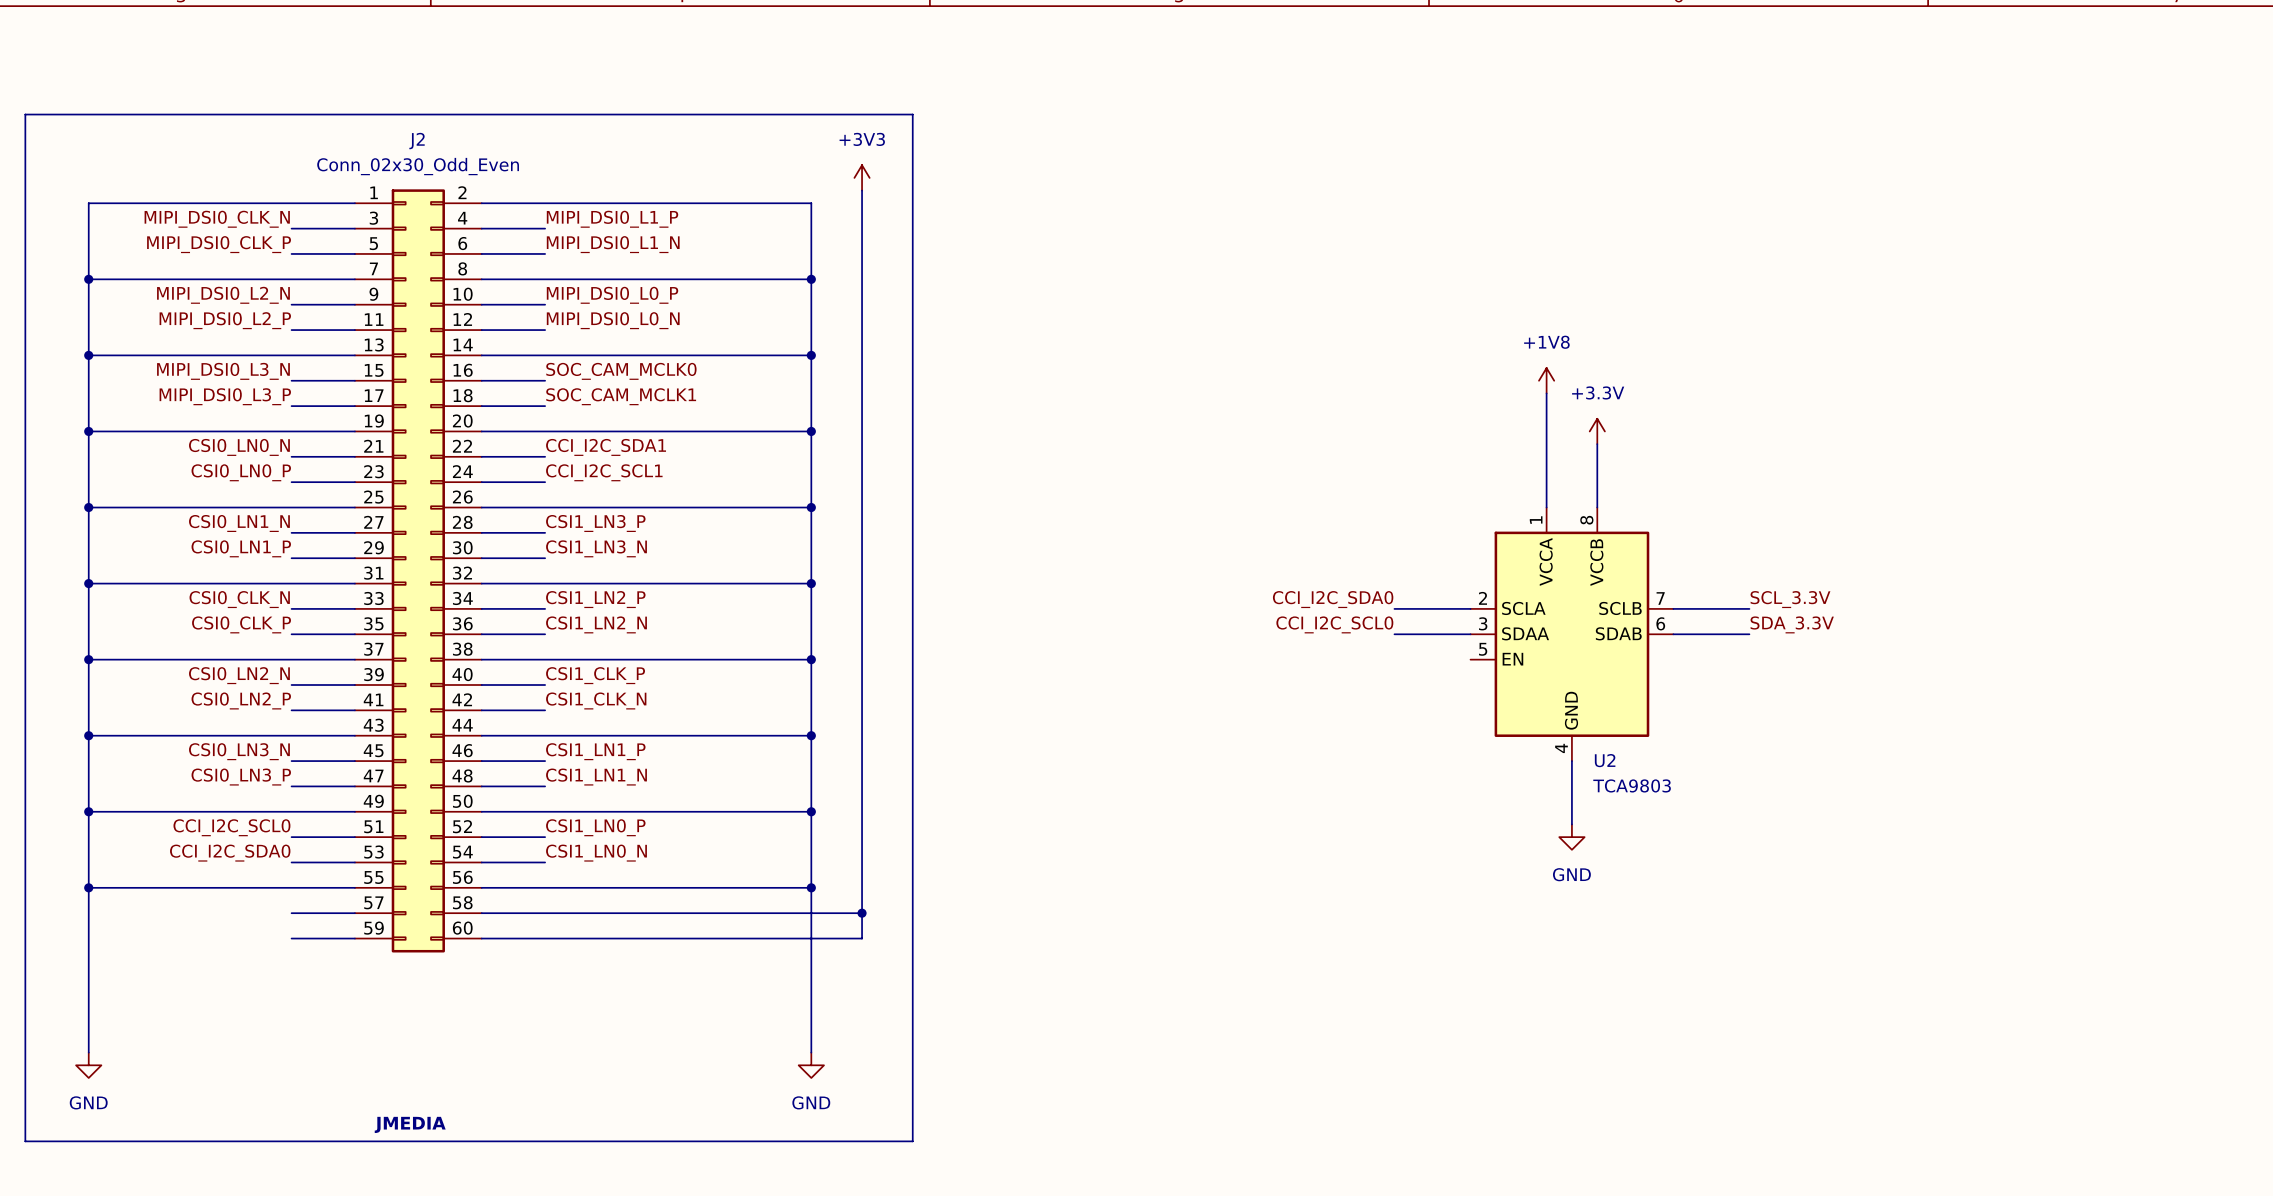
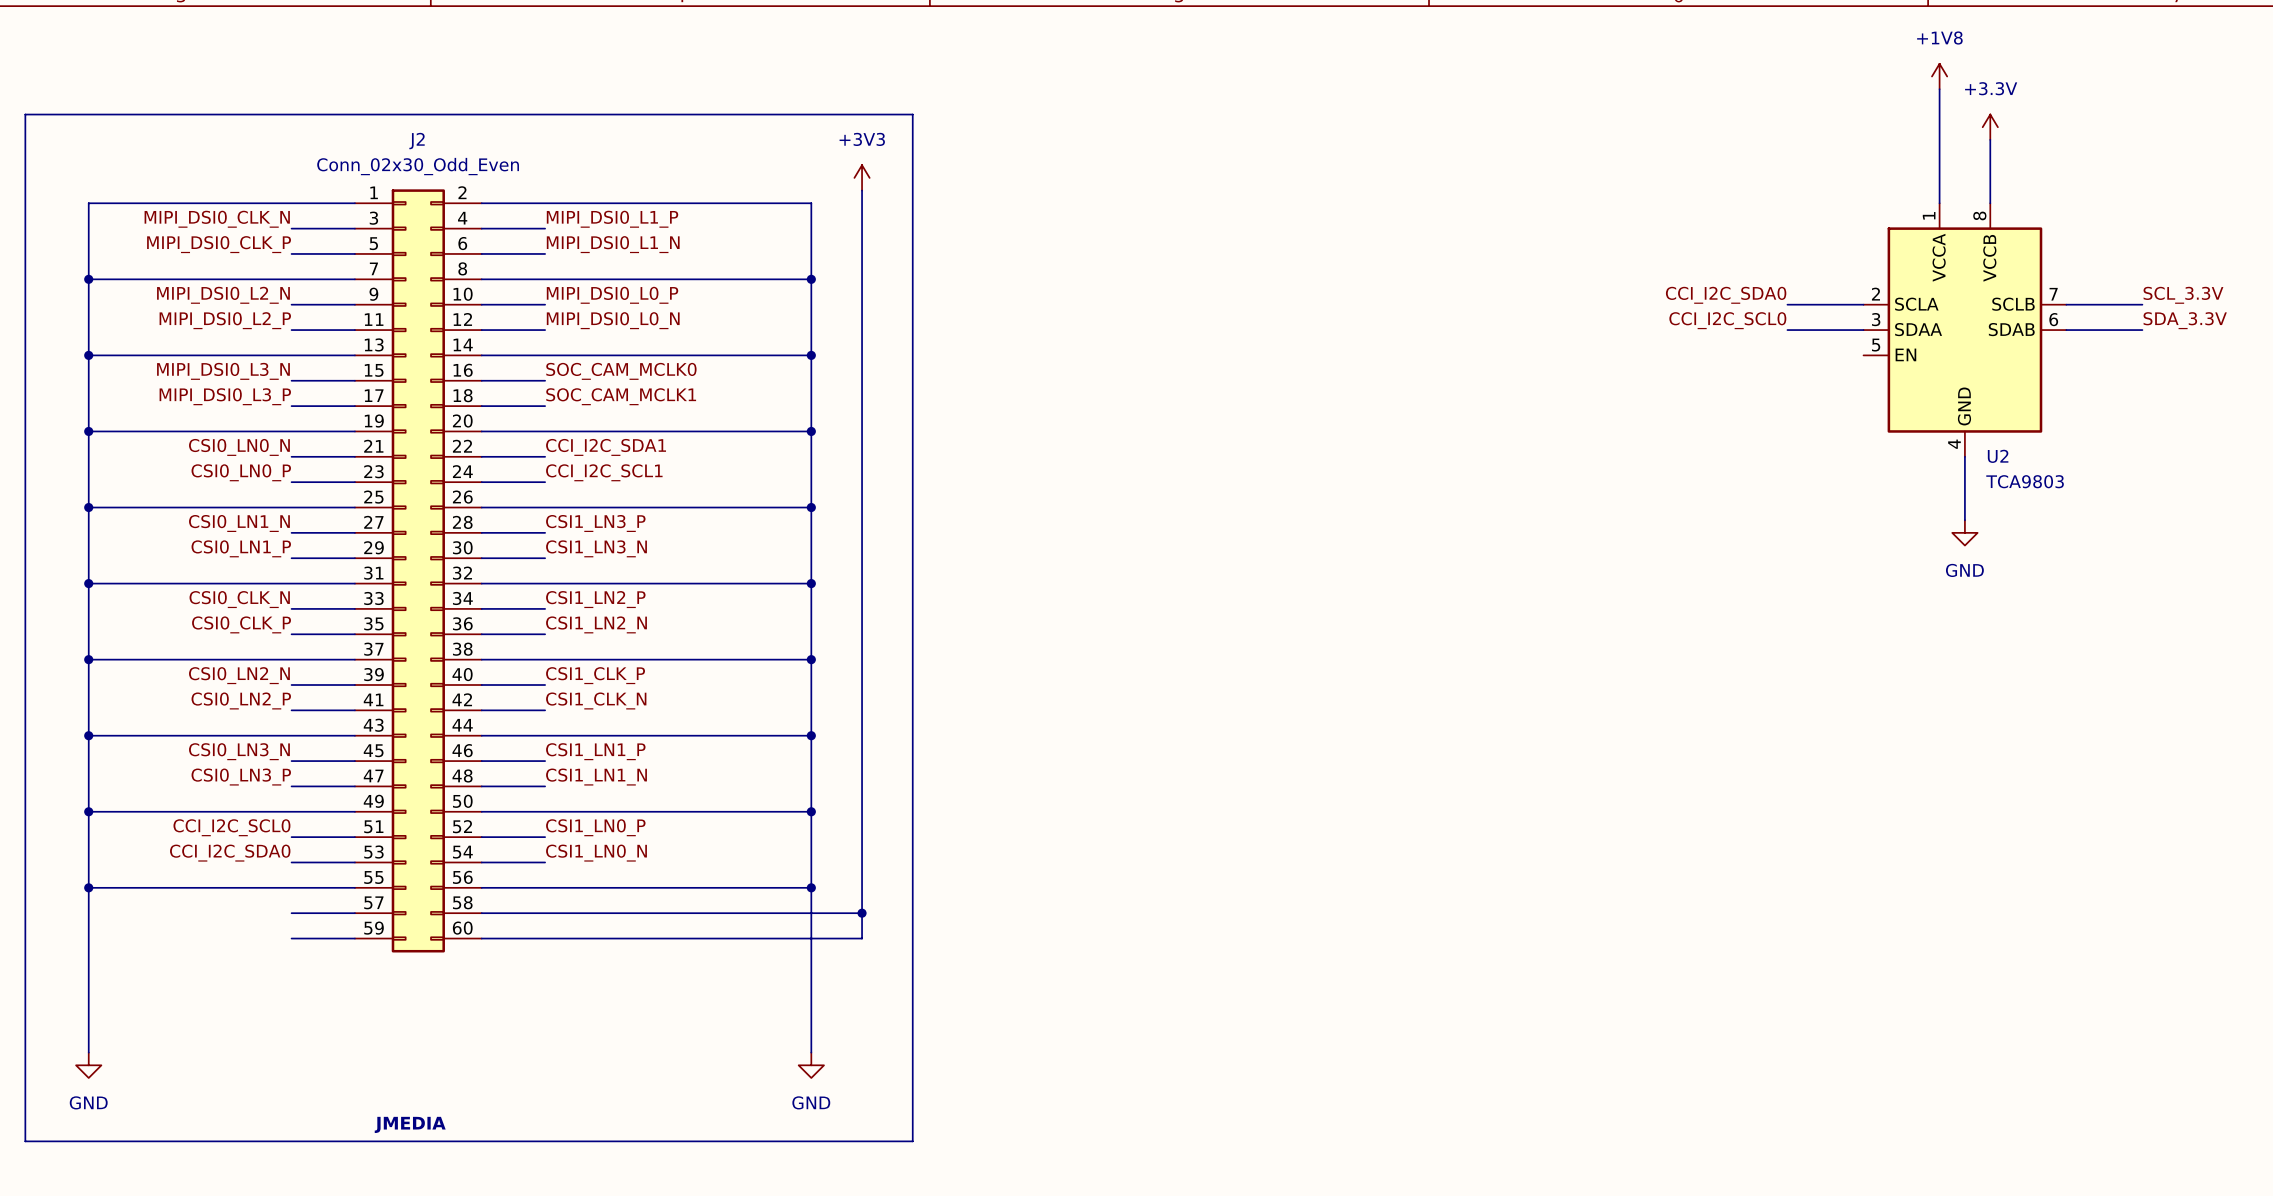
power symbol: none -> +1V8 (1939, 76)
wire: none -> (1939, 89) (1939, 203)
power symbol: none -> +3.3V (1990, 127)
wire: none -> (1990, 139) (1990, 203)
label: none -> CCI_I2C_SDA0 (1726, 295)
label: none -> SCL_3.3V (2183, 295)
wire: none -> (1787, 304) (1863, 304)
wire: none -> (2066, 304) (2142, 304)
label: none -> CCI_I2C_SCL0 (1727, 320)
label: none -> SDA_3.3V (2185, 320)
wire: none -> (1787, 330) (1863, 330)
wire: none -> (2066, 330) (2142, 330)
power symbol: +1V8 (1546, 380) -> none
wire: (1546, 393) (1546, 507) -> none
power symbol: +3.3V (1597, 431) -> none
wire: (1597, 444) (1597, 507) -> none
wire: none -> (1964, 456) (1964, 520)
power symbol: none -> GND (1964, 532)
label: CCI_I2C_SDA0 (1333, 599) -> none
label: SCL_3.3V (1790, 599) -> none
wire: (1394, 608) (1470, 608) -> none
wire: (1673, 608) (1749, 608) -> none
label: CCI_I2C_SCL0 (1334, 624) -> none
label: SDA_3.3V (1792, 624) -> none
wire: (1394, 634) (1470, 634) -> none
U2 position: (1571, 634) -> (1964, 330)
wire: (1673, 634) (1749, 634) -> none
wire: (1571, 761) (1571, 824) -> none
power symbol: GND (1571, 837) -> none

